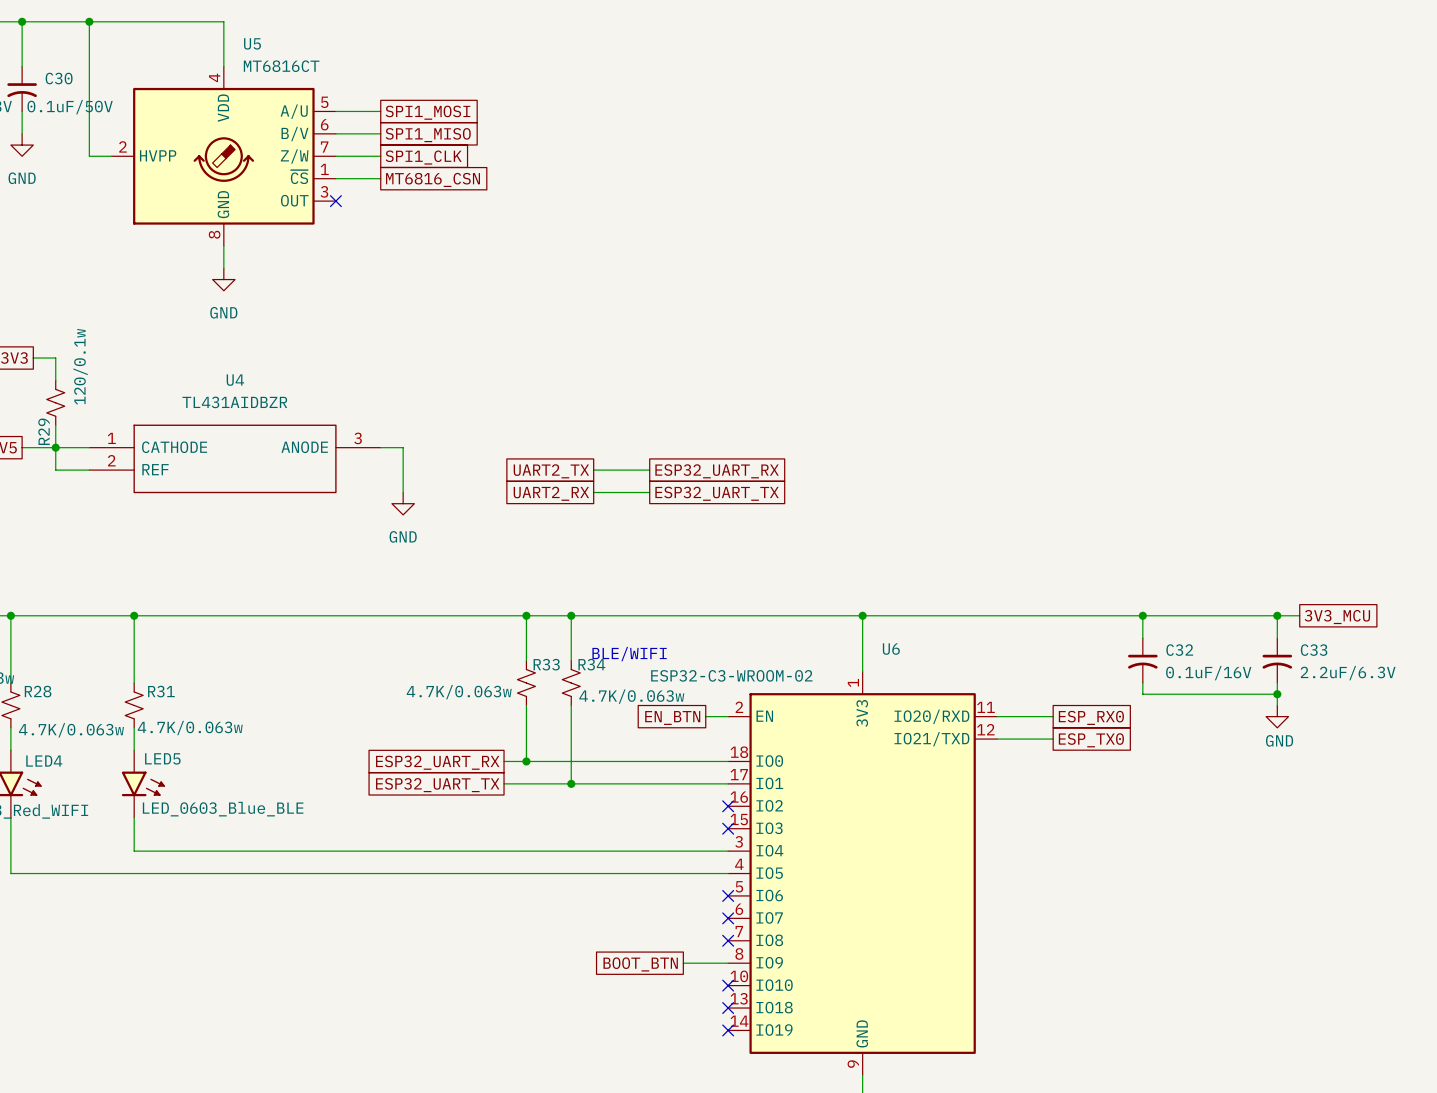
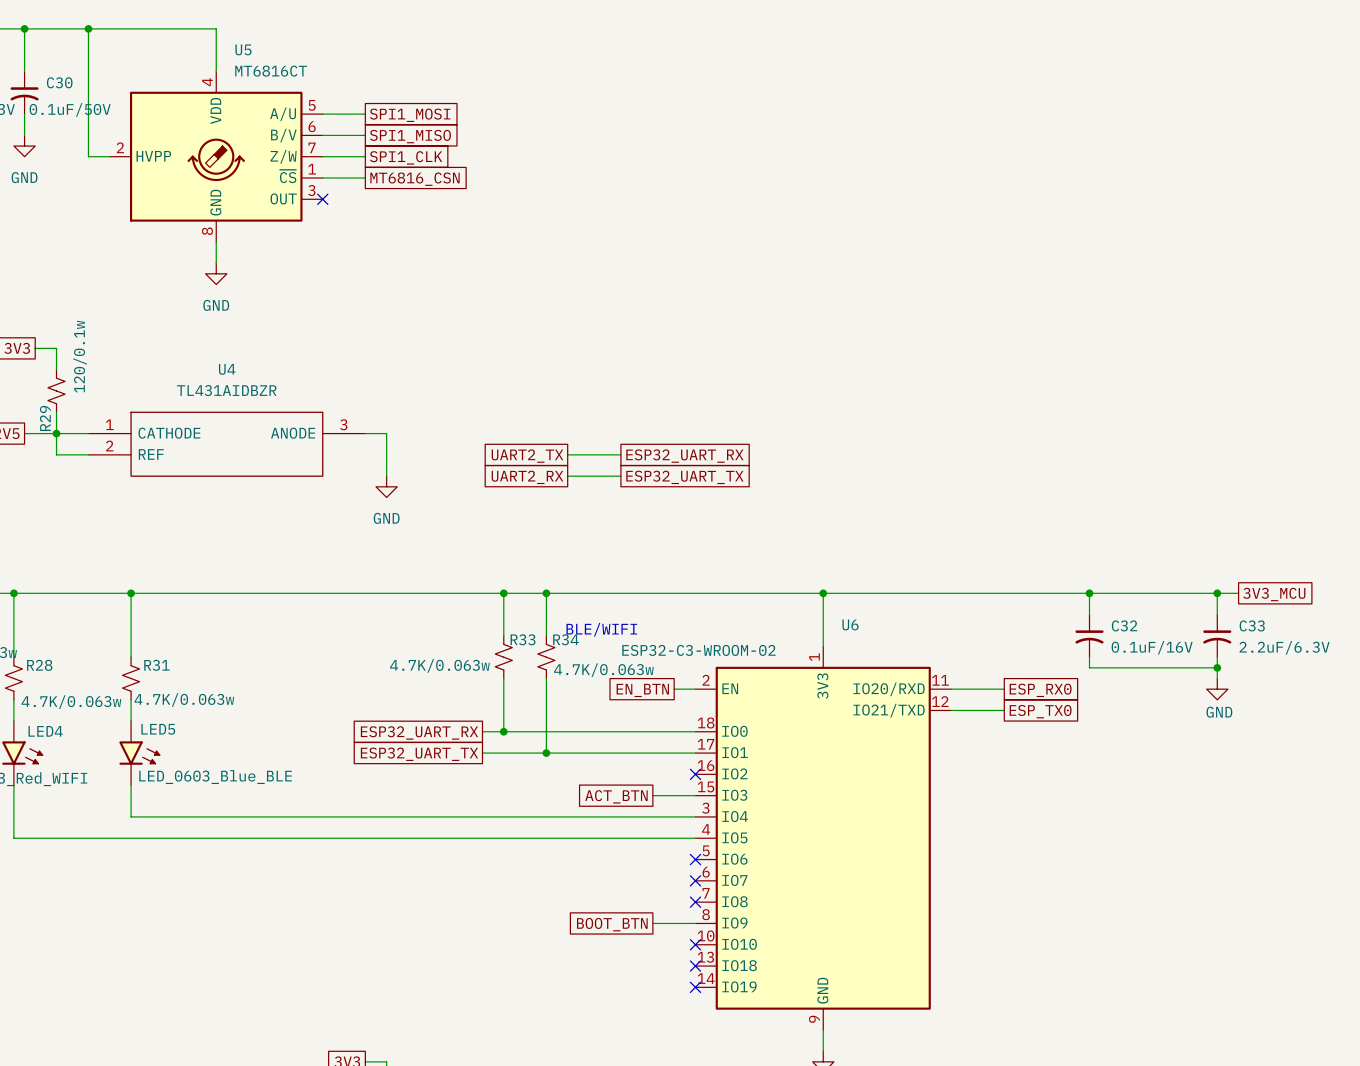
wire: none -> (652, 795) (695, 795)
no-connect mark: (728, 828) -> none
global label: none -> ACT_BTN (616, 796)

